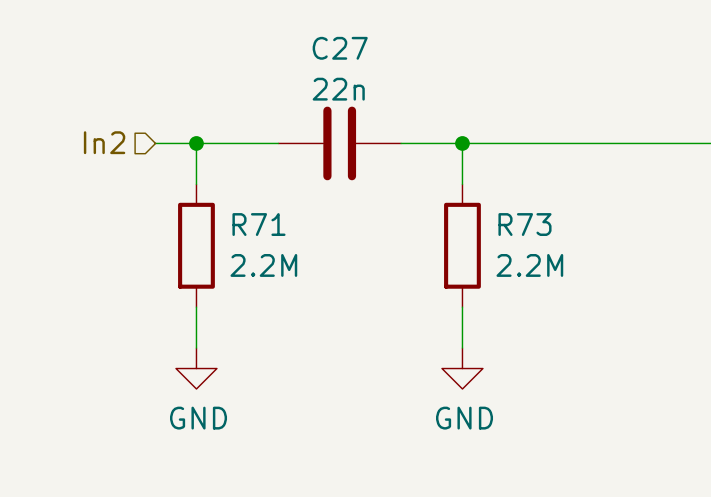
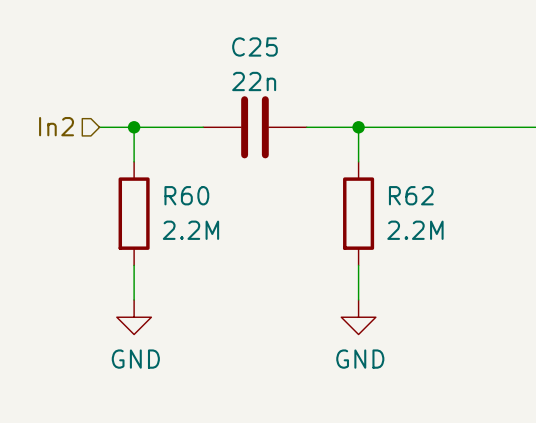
C27 name: C27 (340, 48) -> C25 (254, 46)
R71 name: R71 (258, 224) -> R60 (186, 195)
R73 name: R73 (524, 224) -> R62 (411, 195)

